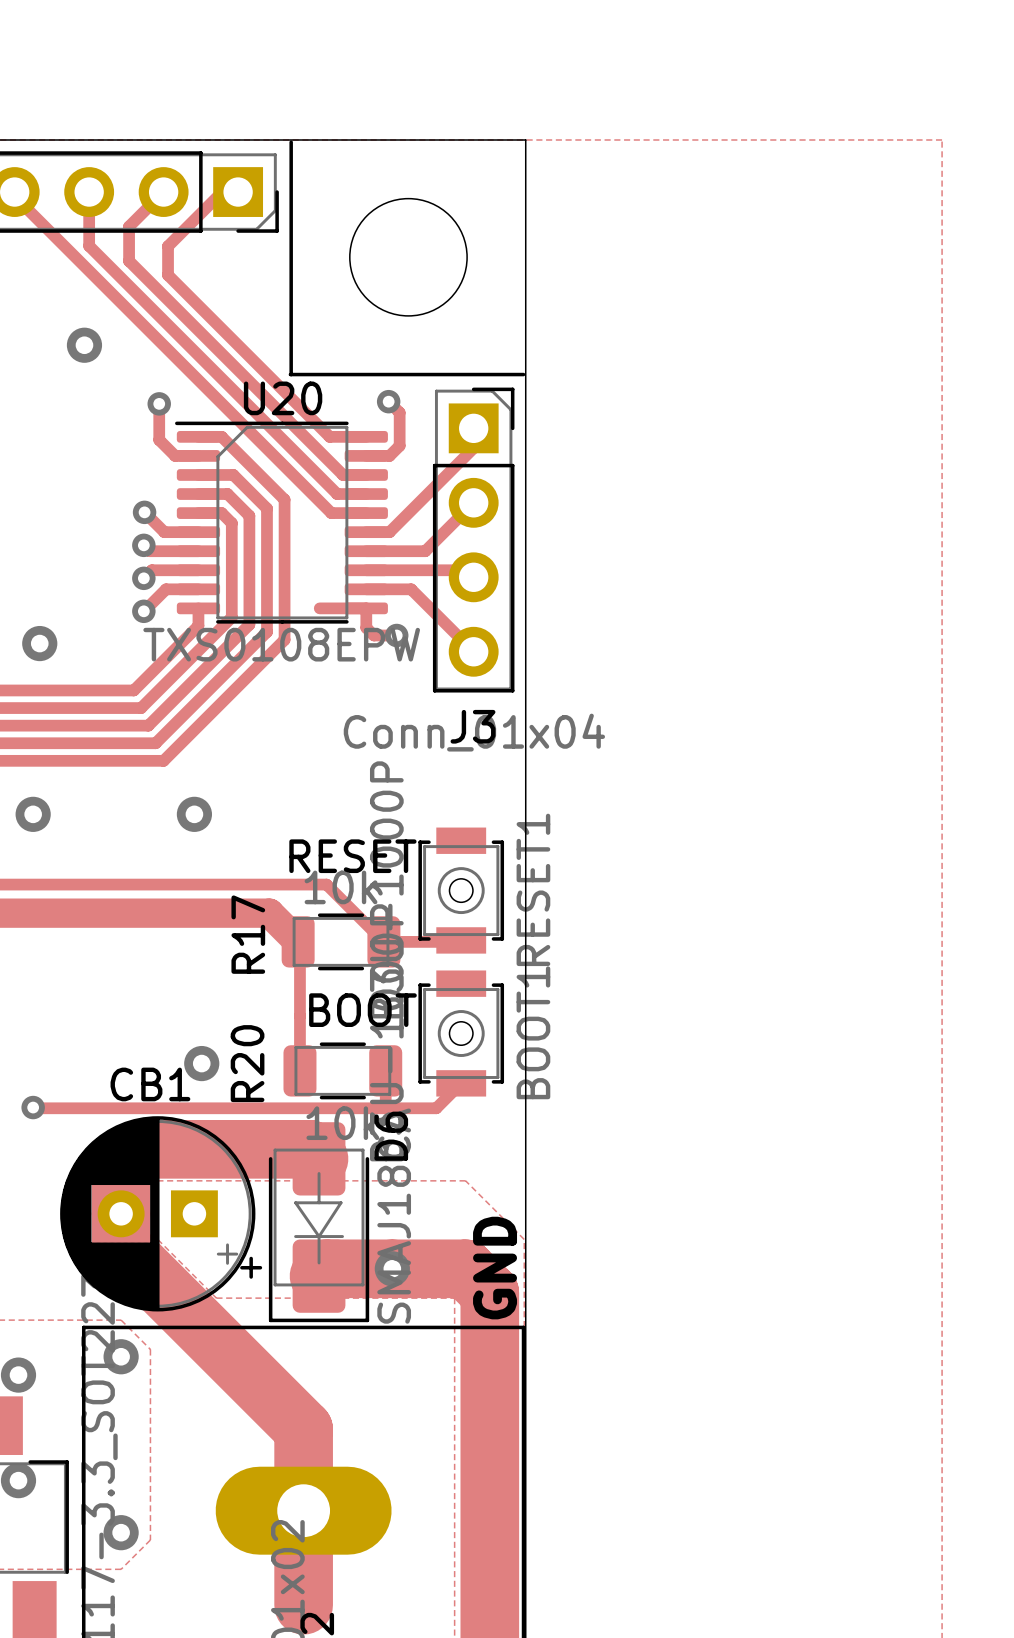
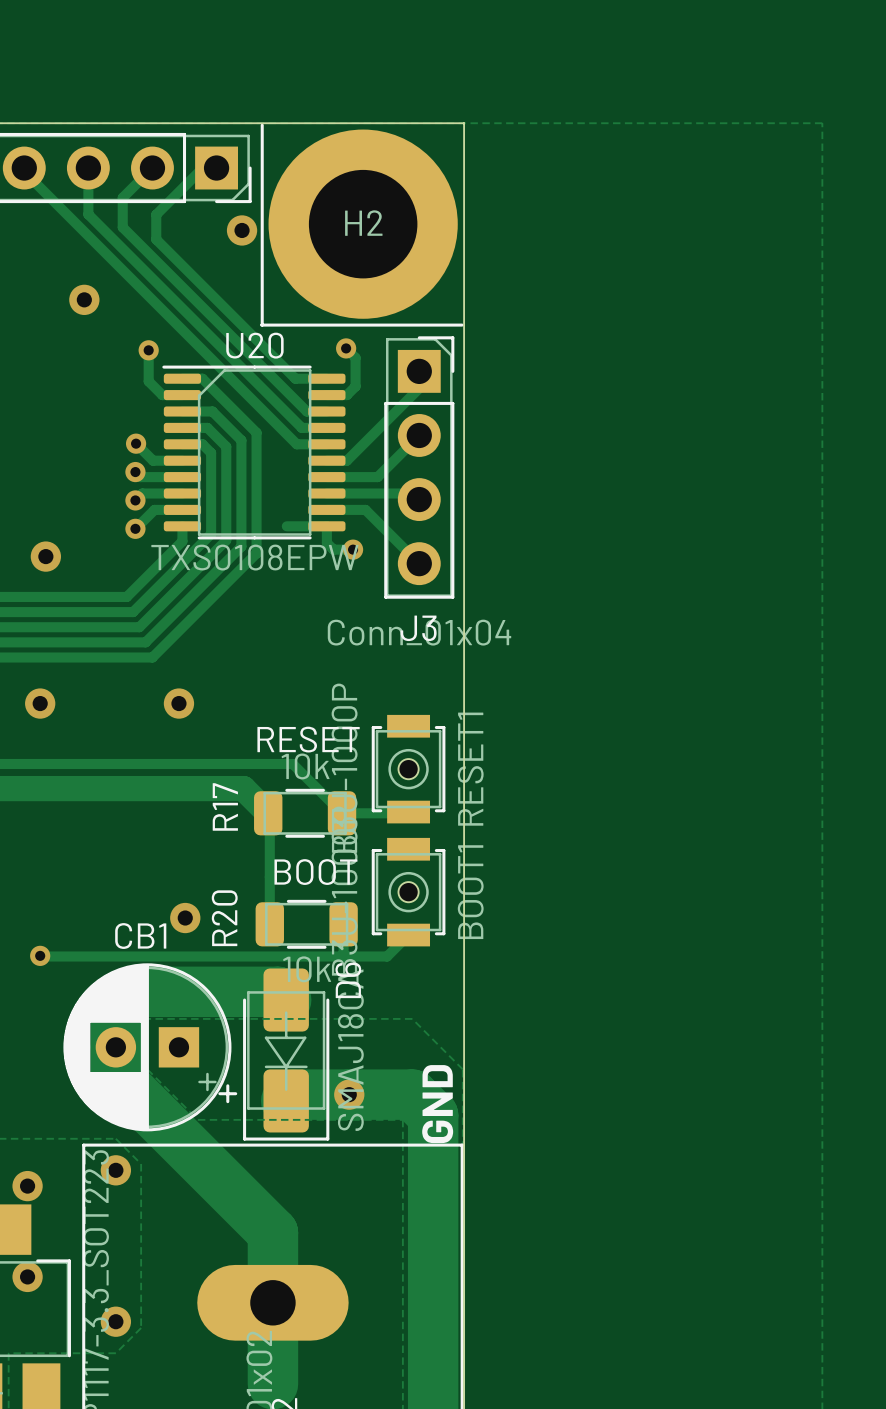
round board edge: [349, 197, 468, 317] -> none
H2: none -> (363, 224)
via: none -> (242, 230)

